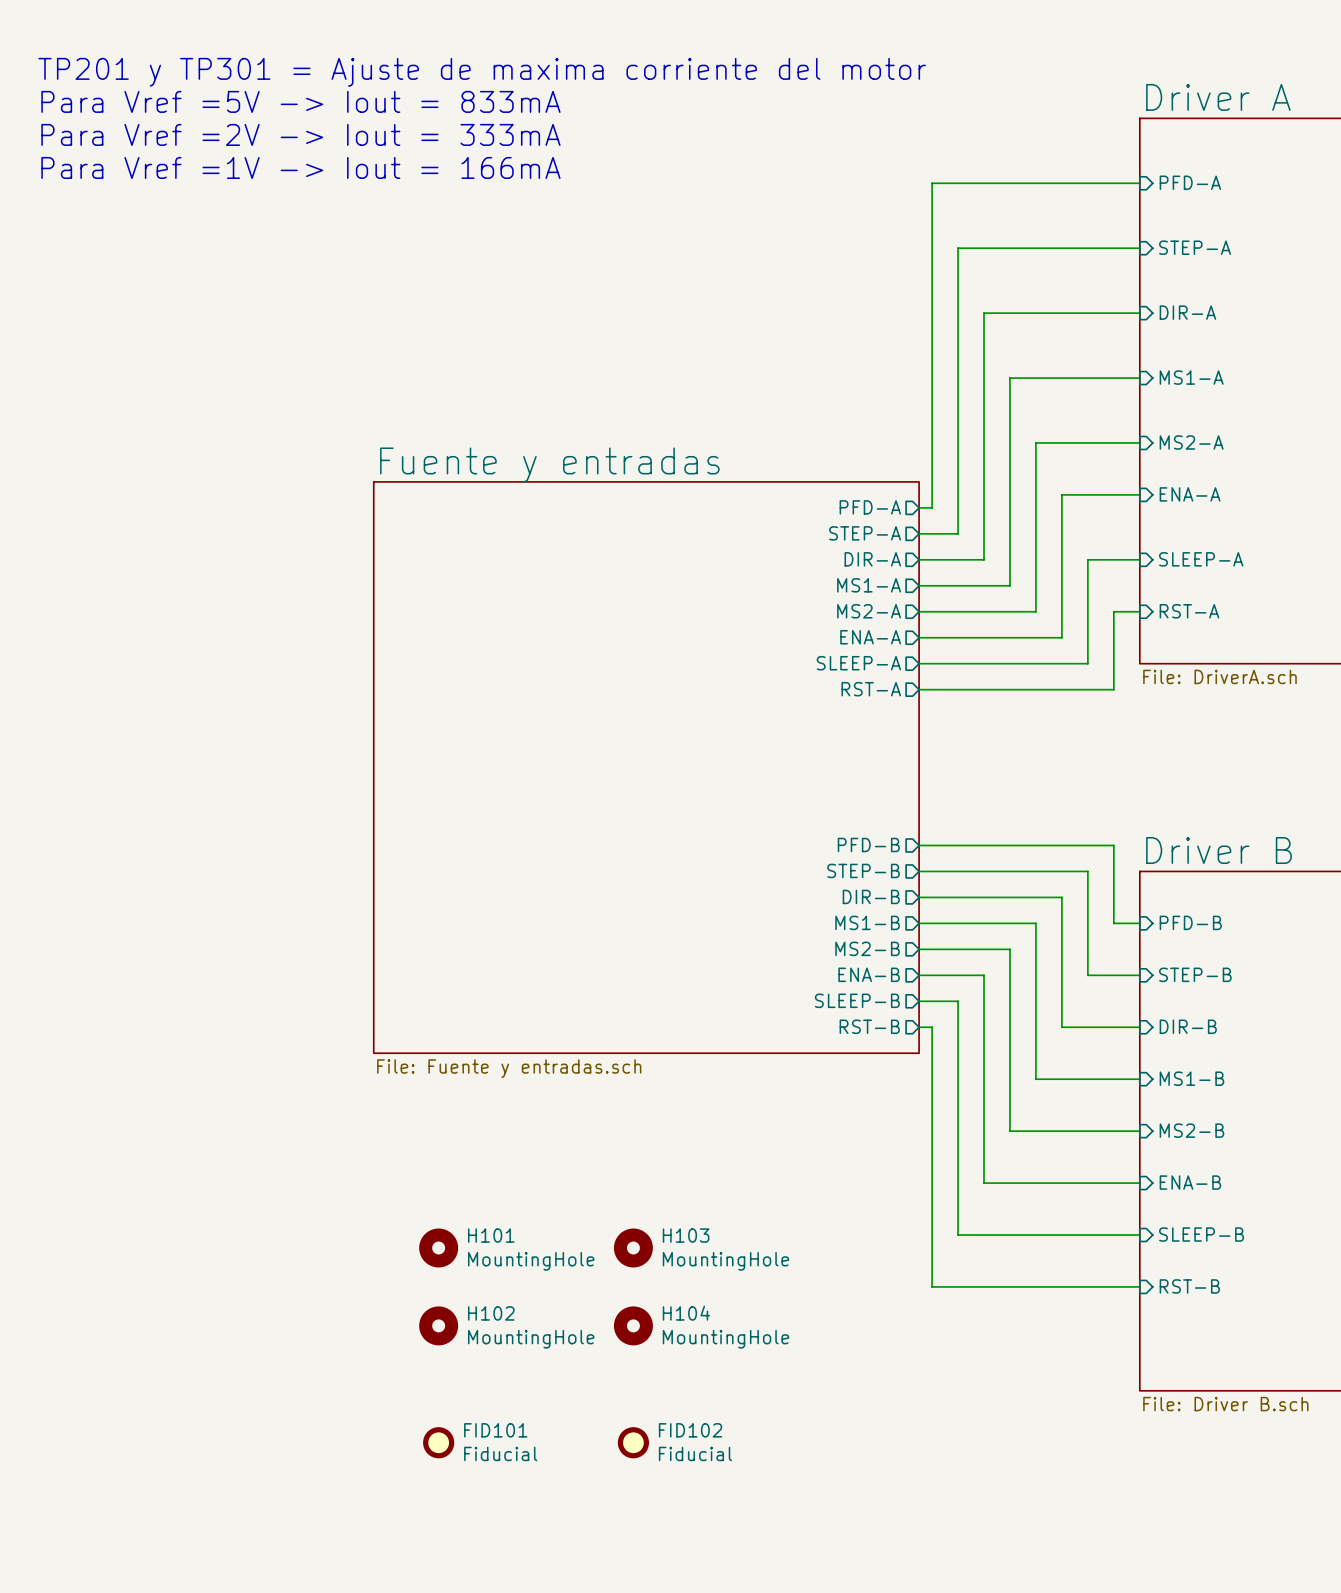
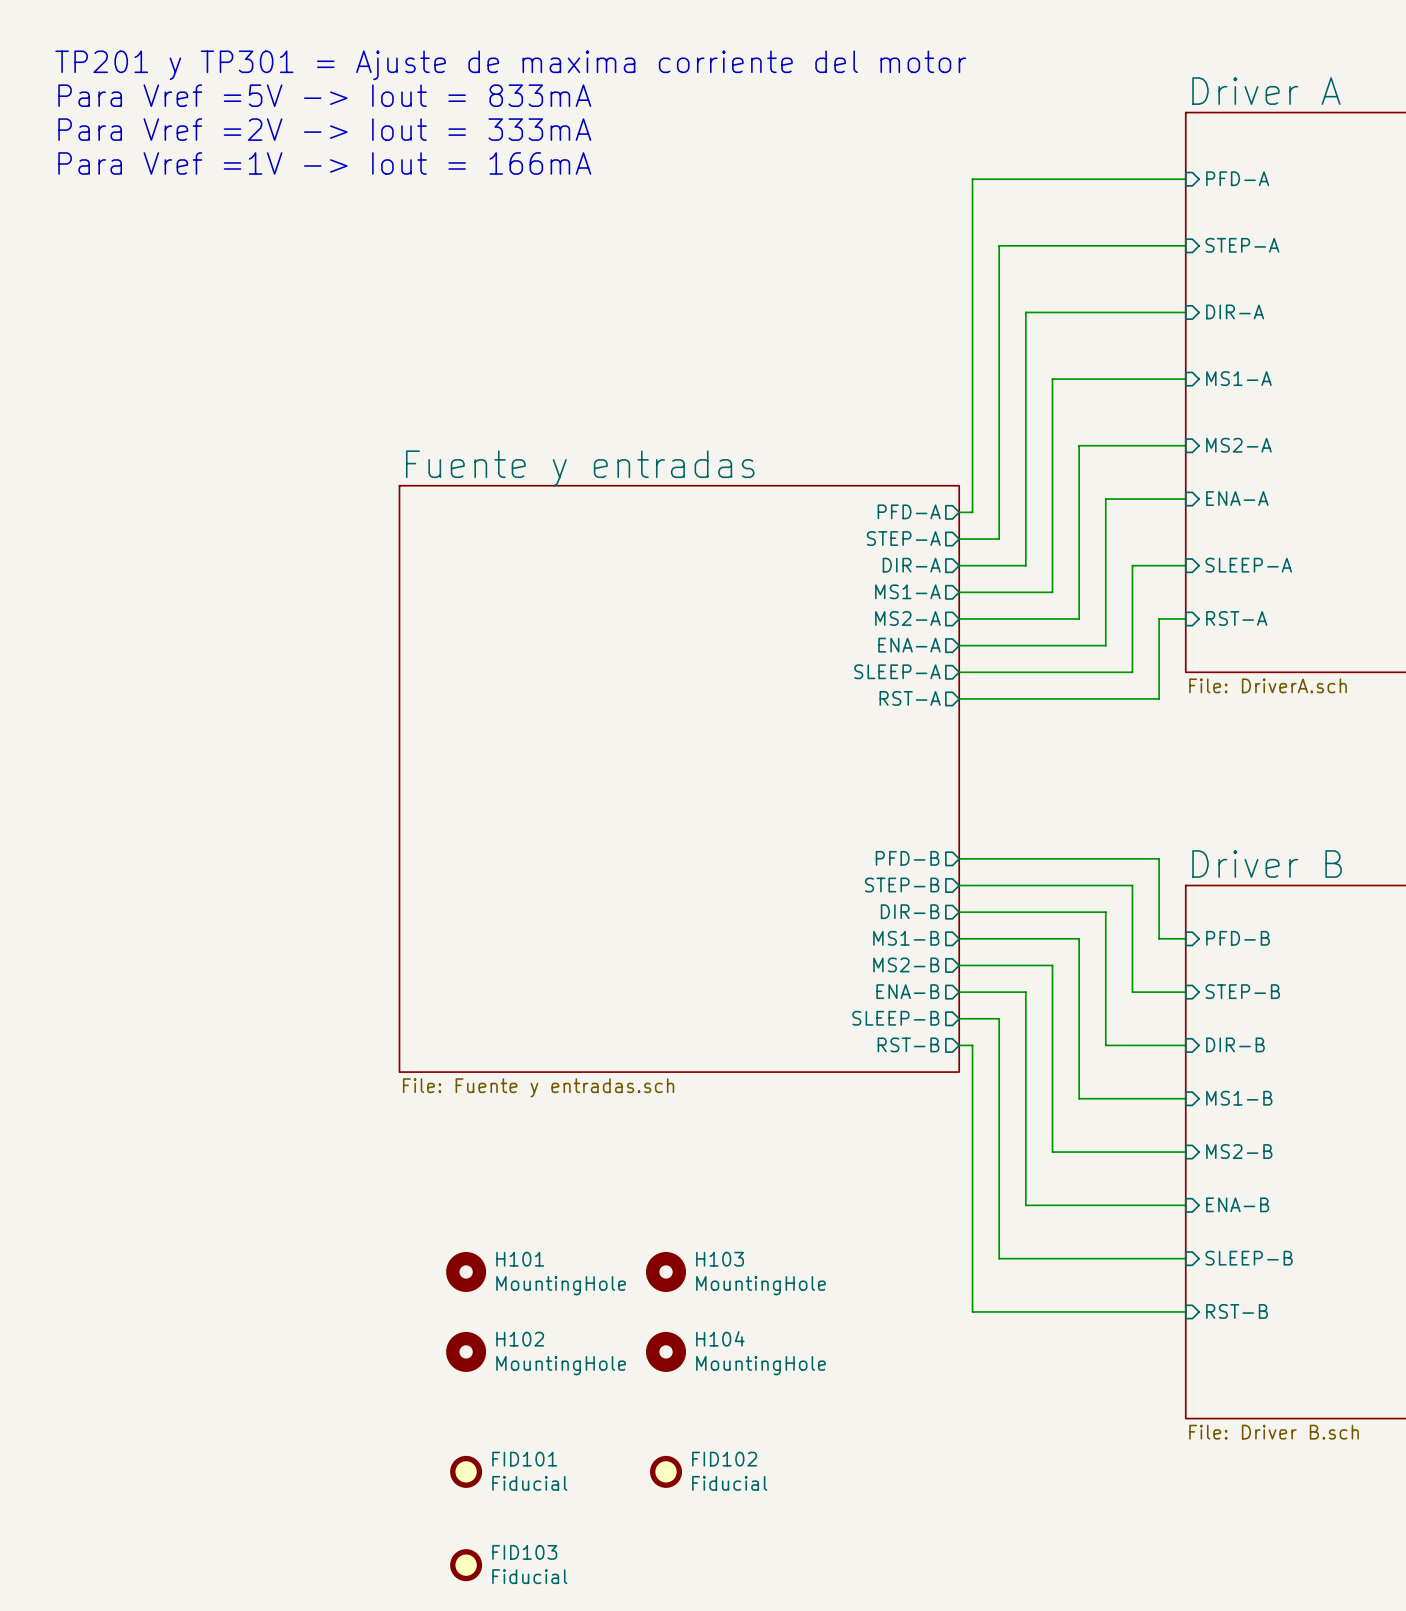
FID103: none -> Fiducial (466, 1565)

